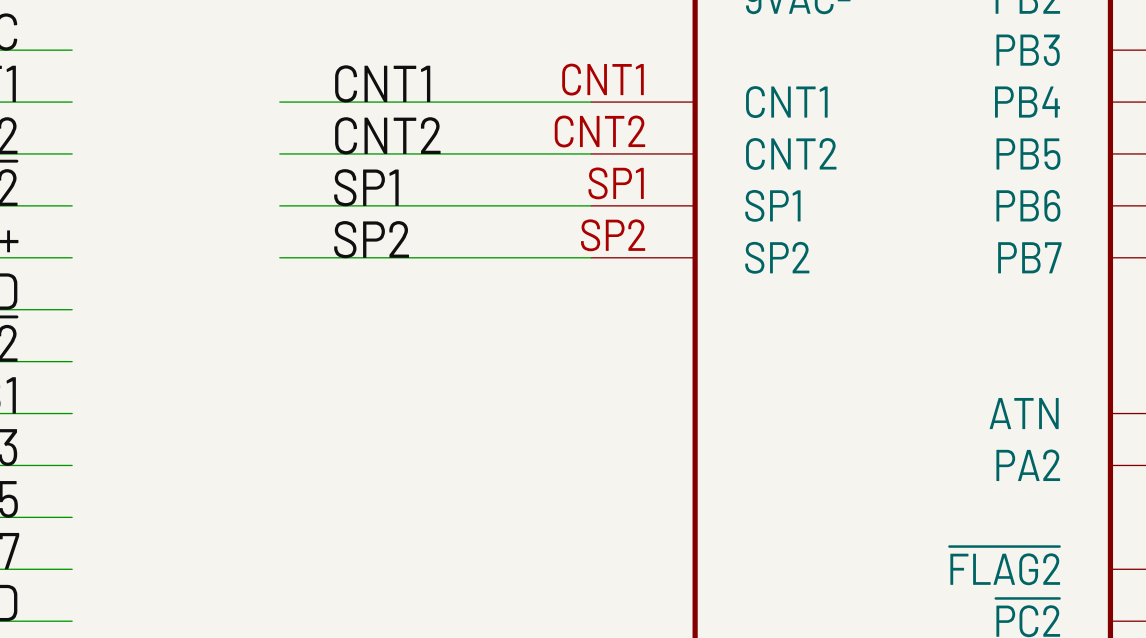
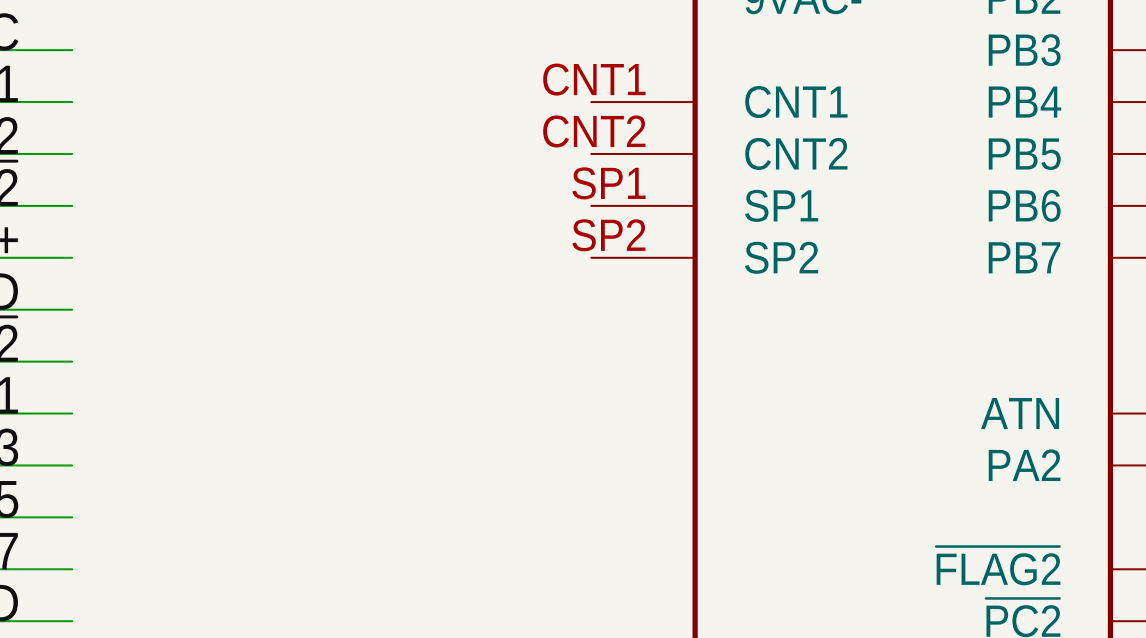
label: CNT1 (382, 83) -> none
wire: (279, 102) (591, 102) -> none
label: CNT2 (387, 135) -> none
wire: (279, 153) (591, 153) -> none
label: SP1 (366, 187) -> none
wire: (279, 205) (591, 205) -> none
label: SP2 (371, 239) -> none
wire: (279, 257) (591, 257) -> none

